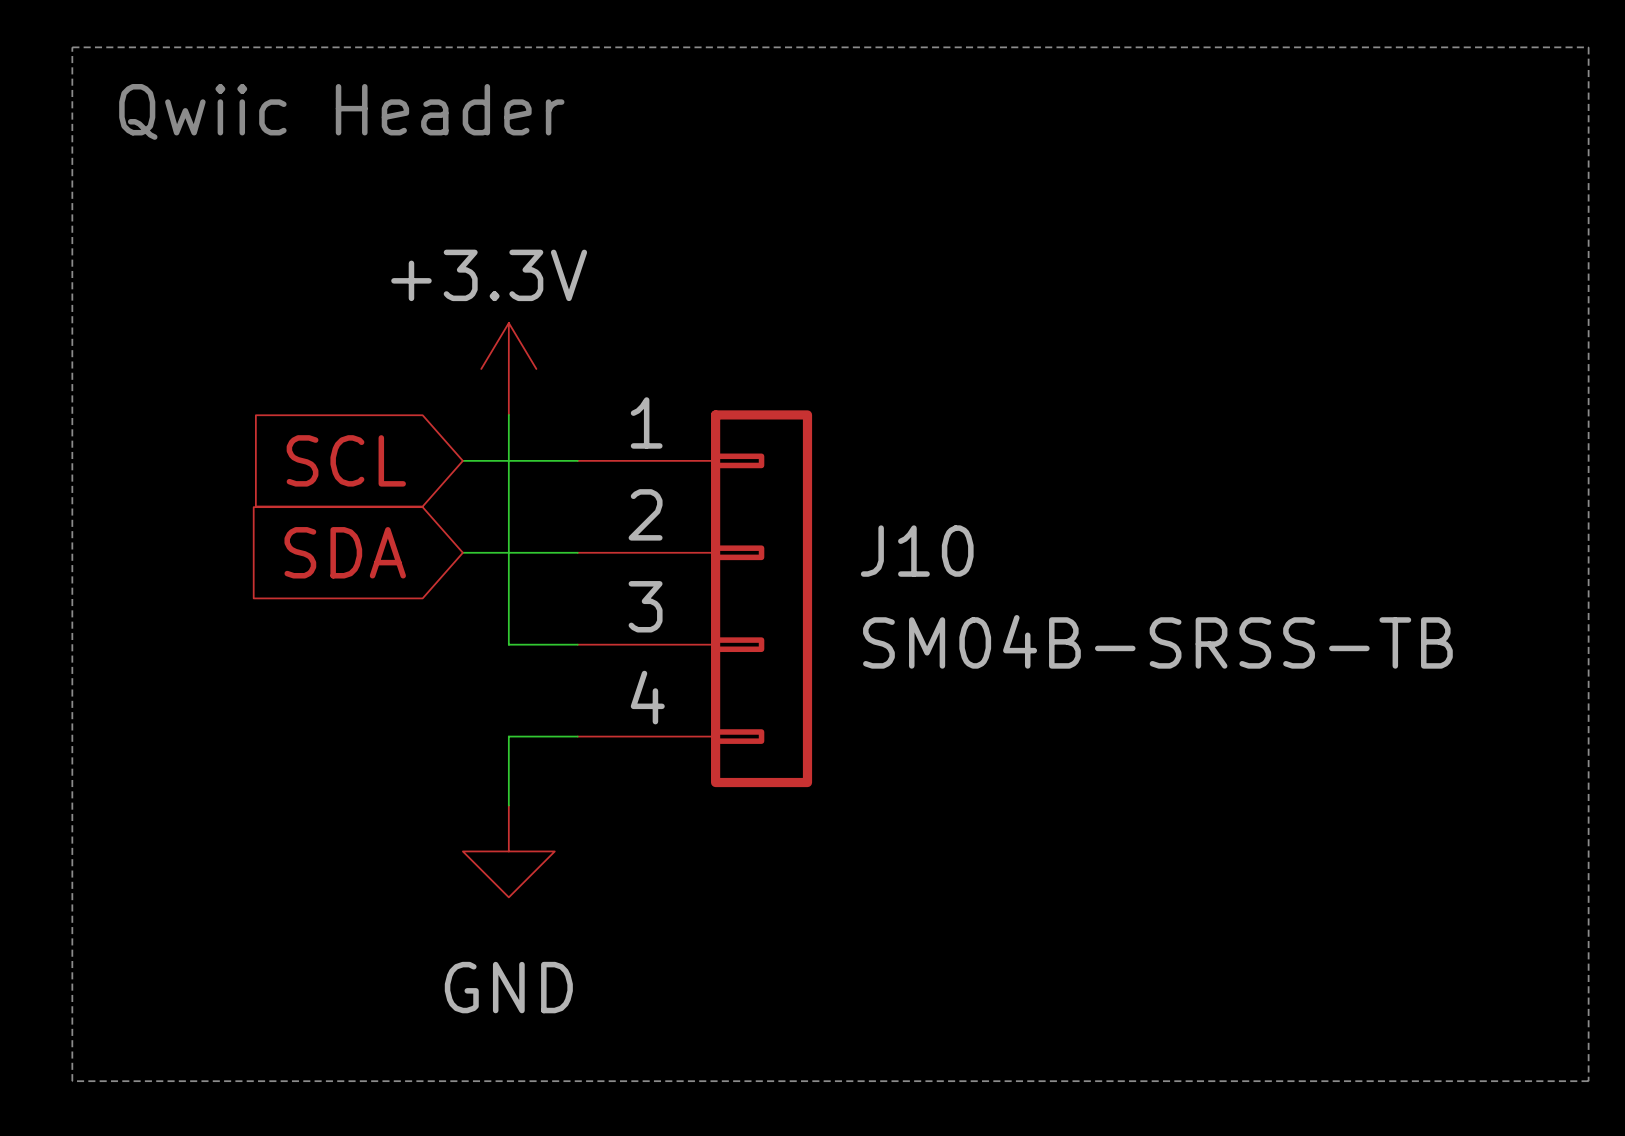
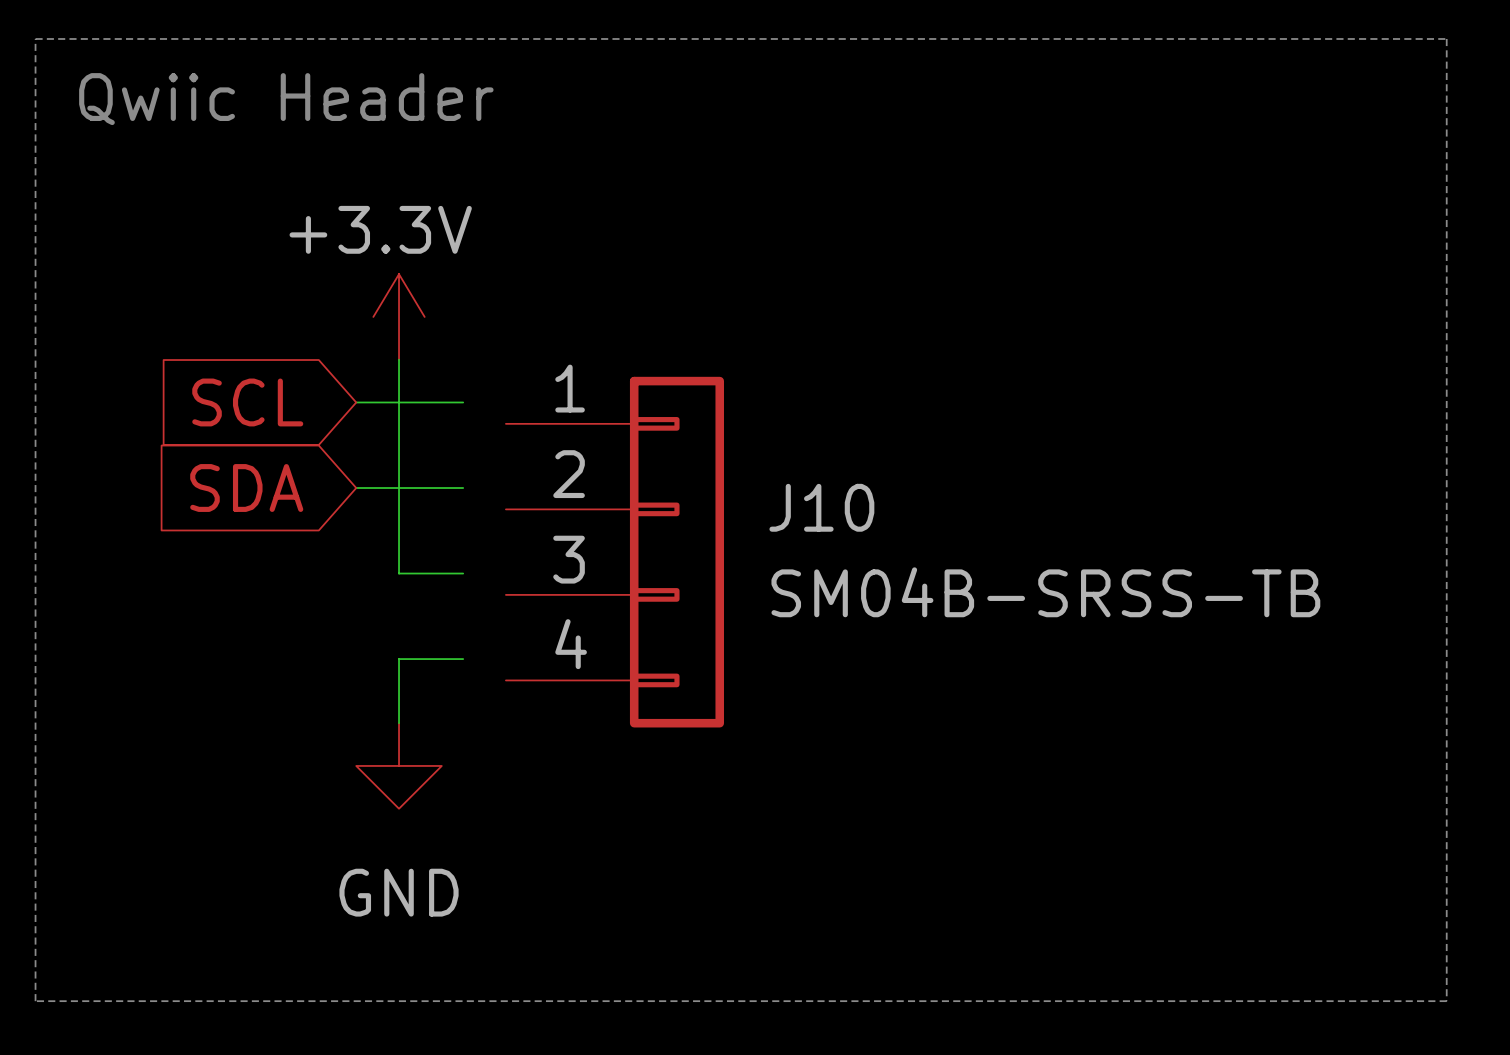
power symbol position: +3.3V (508, 368) -> +3.3V (399, 316)
wire: (508, 414) (508, 644) (577, 644) -> (399, 359) (399, 573) (463, 573)
global label position: SCL (346, 460) -> SCL (247, 402)
wire: (462, 460) (577, 460) -> (356, 402) (463, 402)
global label position: SDA (345, 552) -> SDA (246, 488)
wire: (462, 552) (577, 552) -> (356, 488) (463, 488)
wire: (577, 736) (508, 736) (508, 805) -> (463, 659) (399, 659) (399, 723)
power symbol position: GND (508, 851) -> GND (399, 765)

